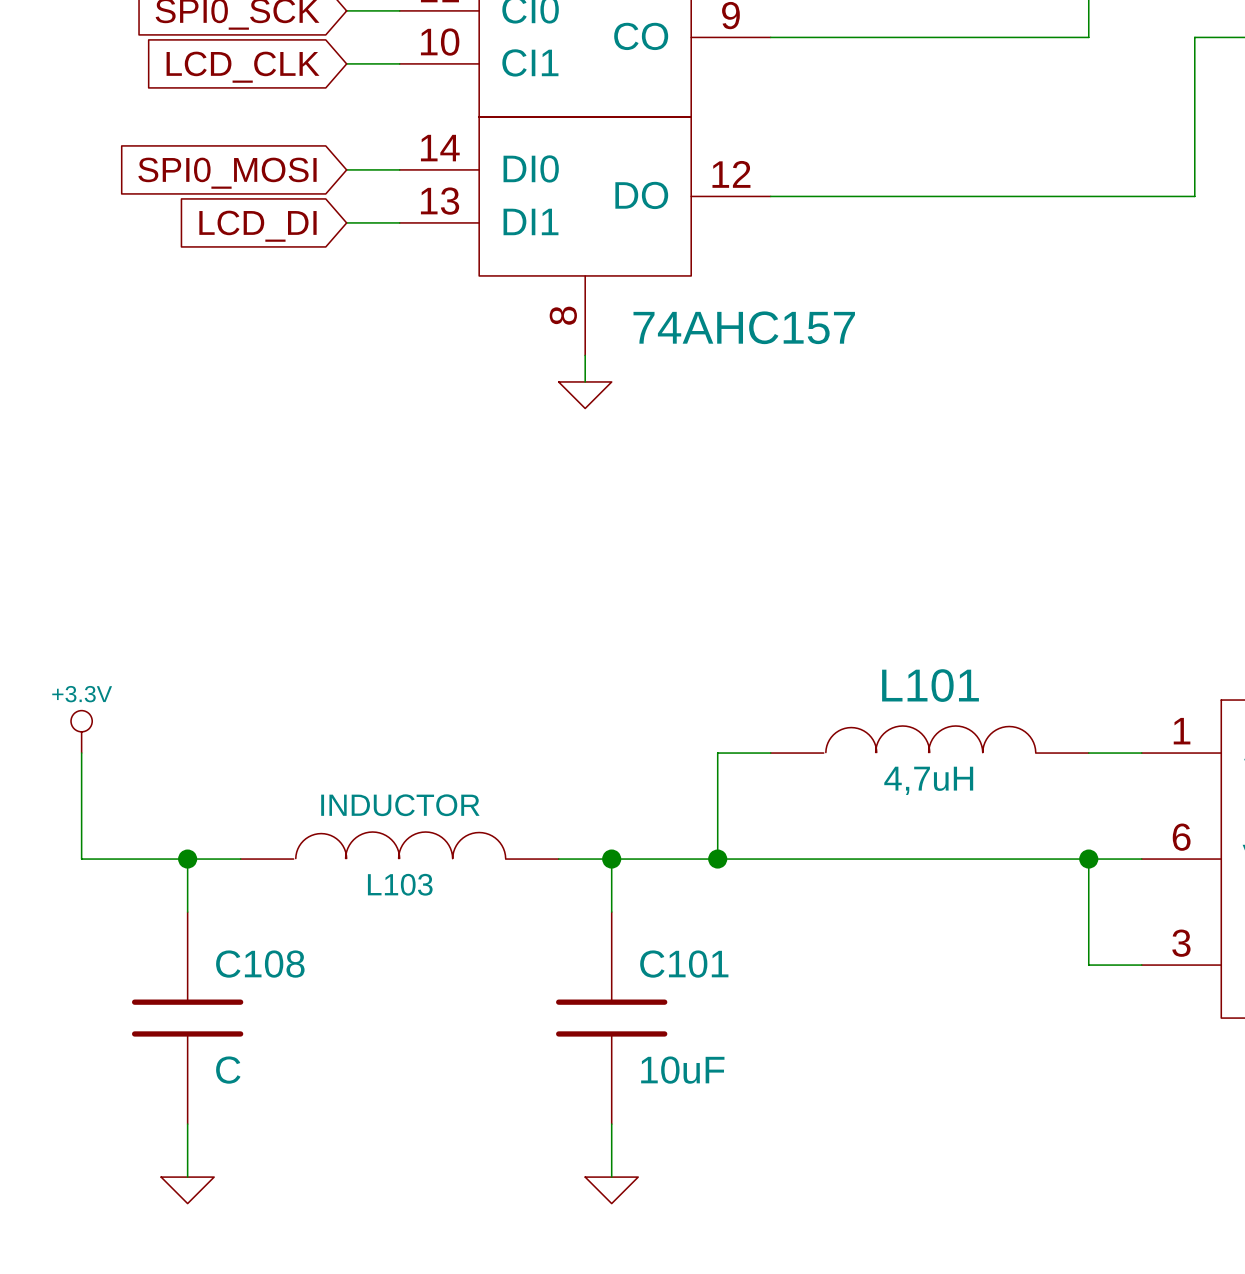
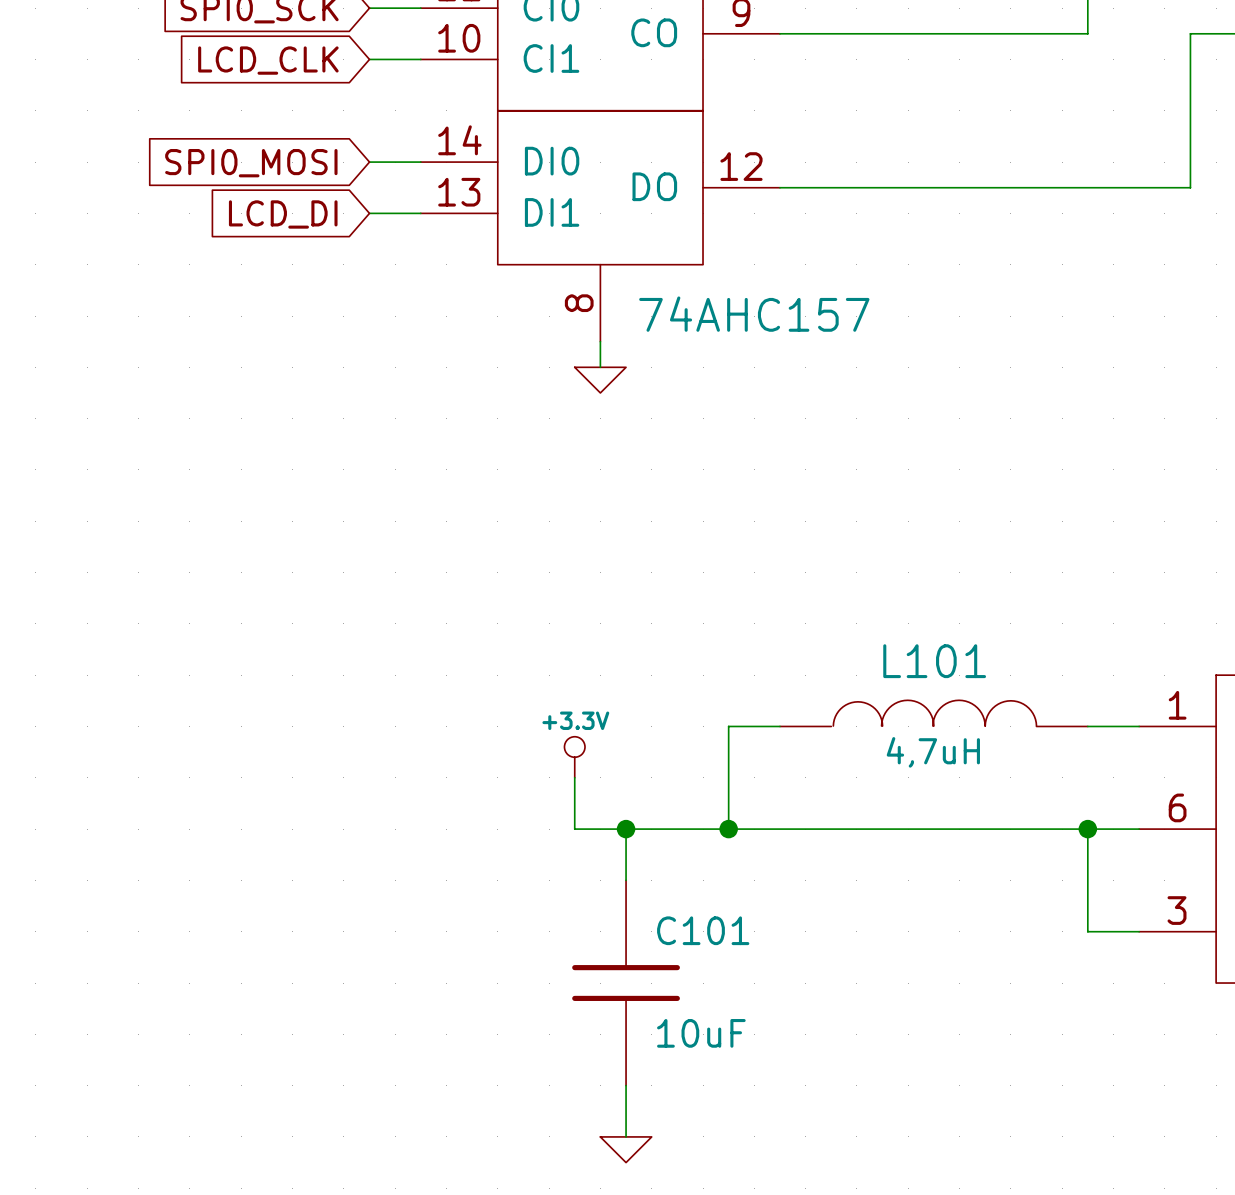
power symbol position: +3.3V (81, 731) -> +3.3V (574, 757)
wire: (81, 753) (81, 859) (240, 859) -> none
L103: INDUCTOR (399, 845) -> none
wire: (187, 859) (187, 912) -> (574, 777) (574, 829)
junction: (187, 859) -> none
C108: C (187, 1018) -> none
wire: (187, 1124) (187, 1177) -> none
power symbol: (187, 1190) -> none

